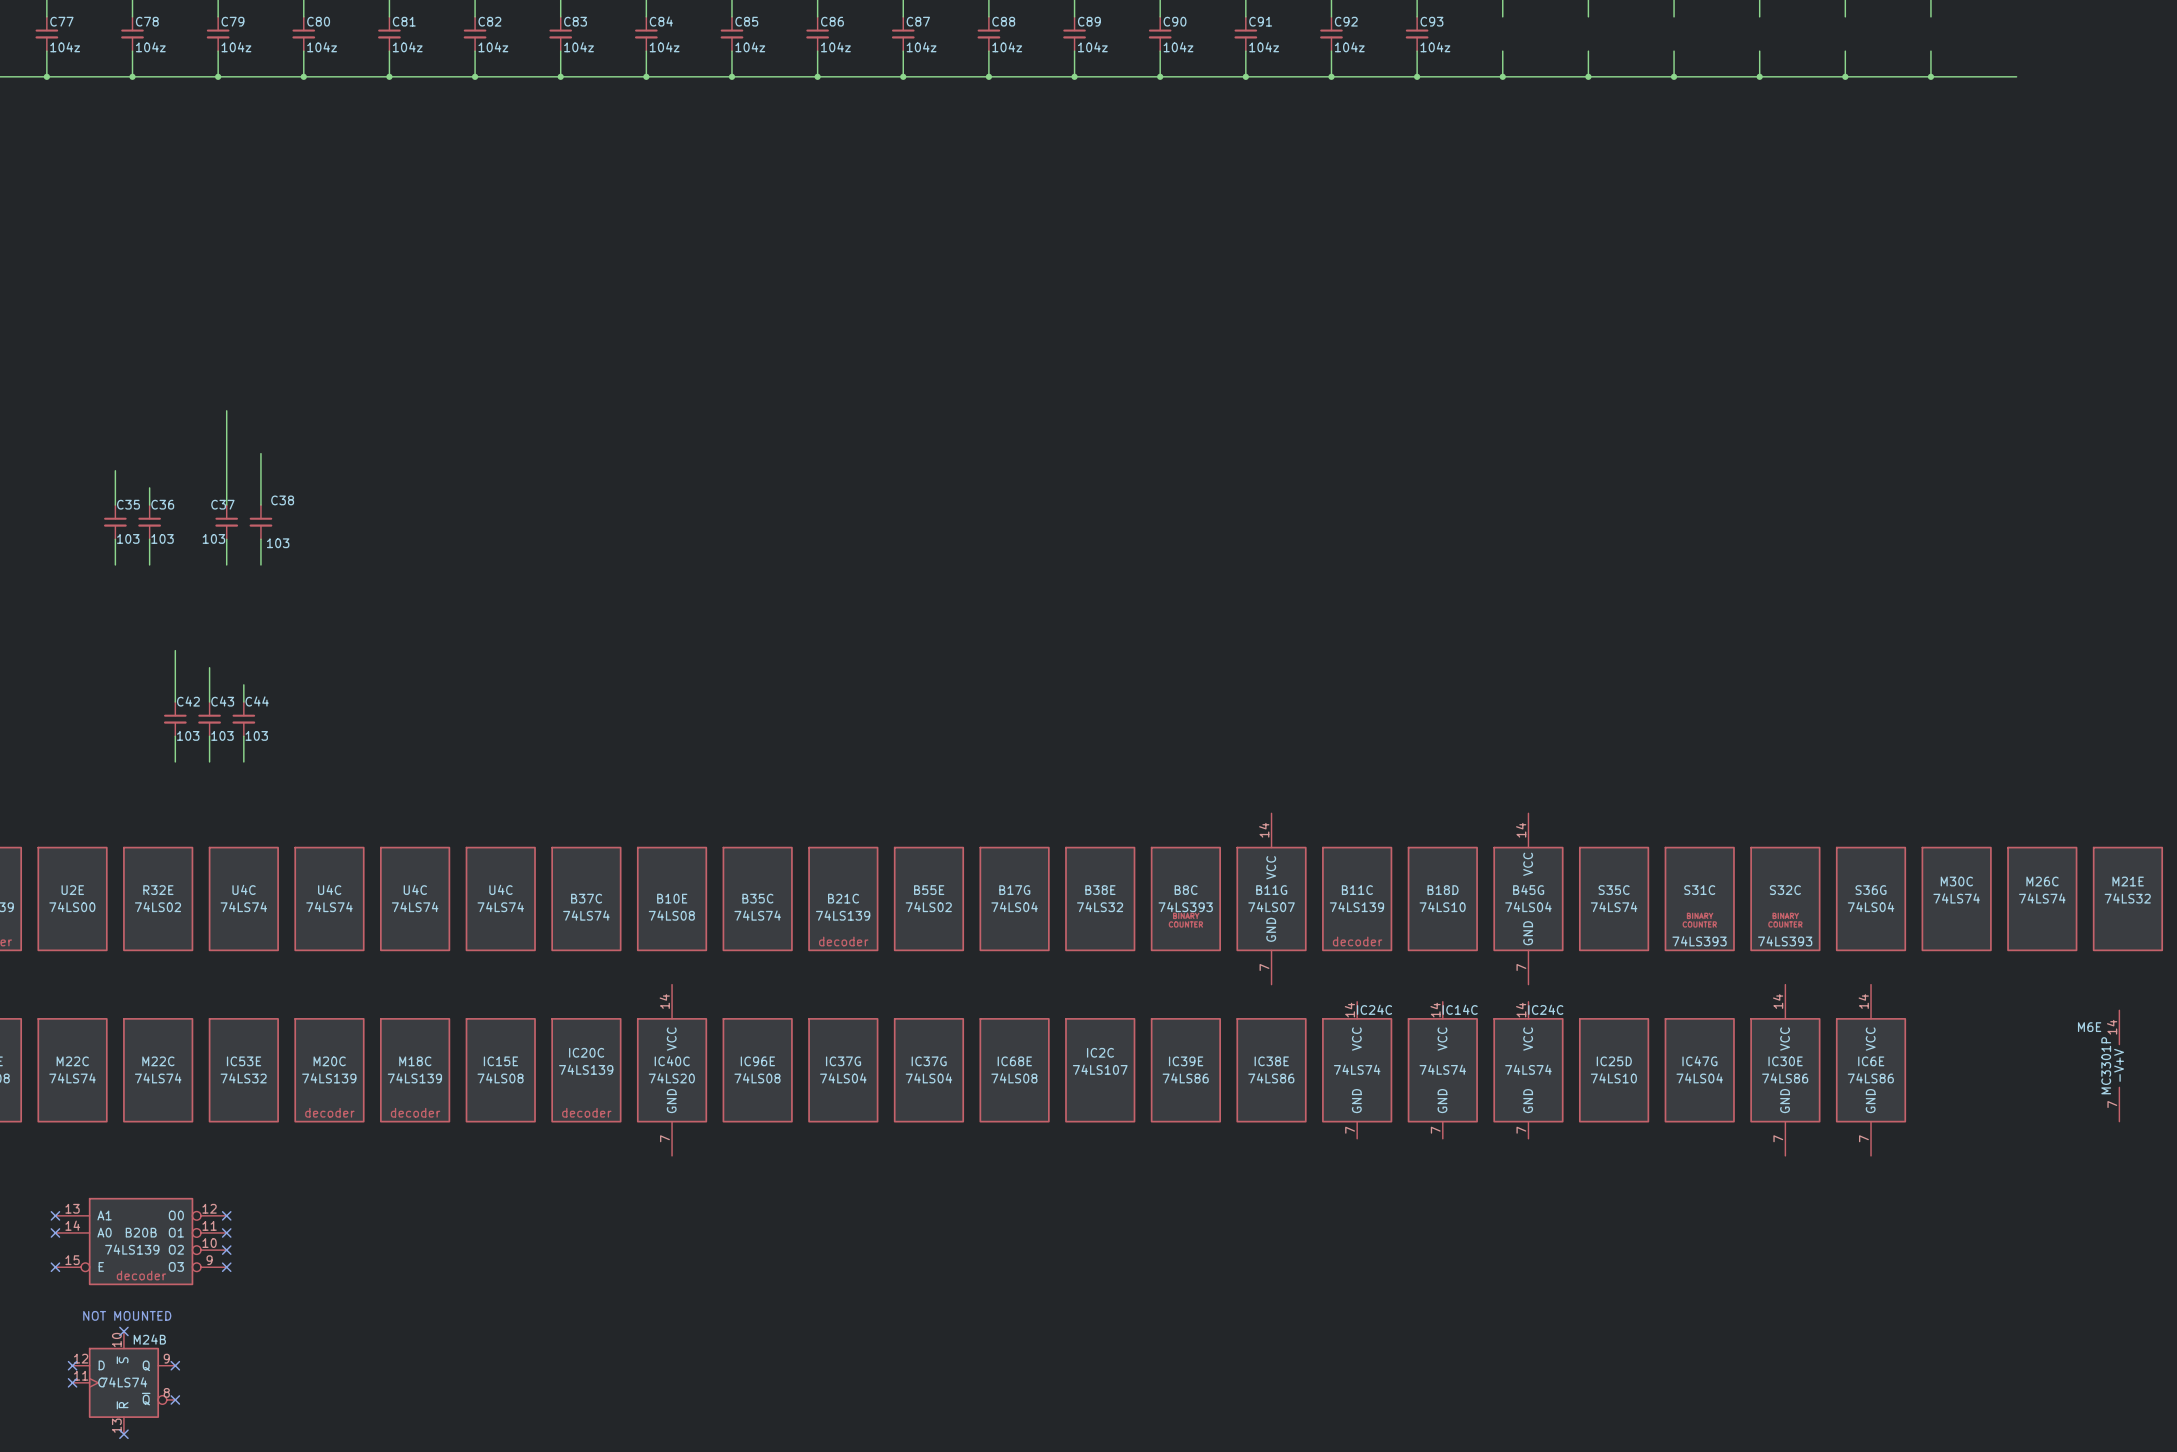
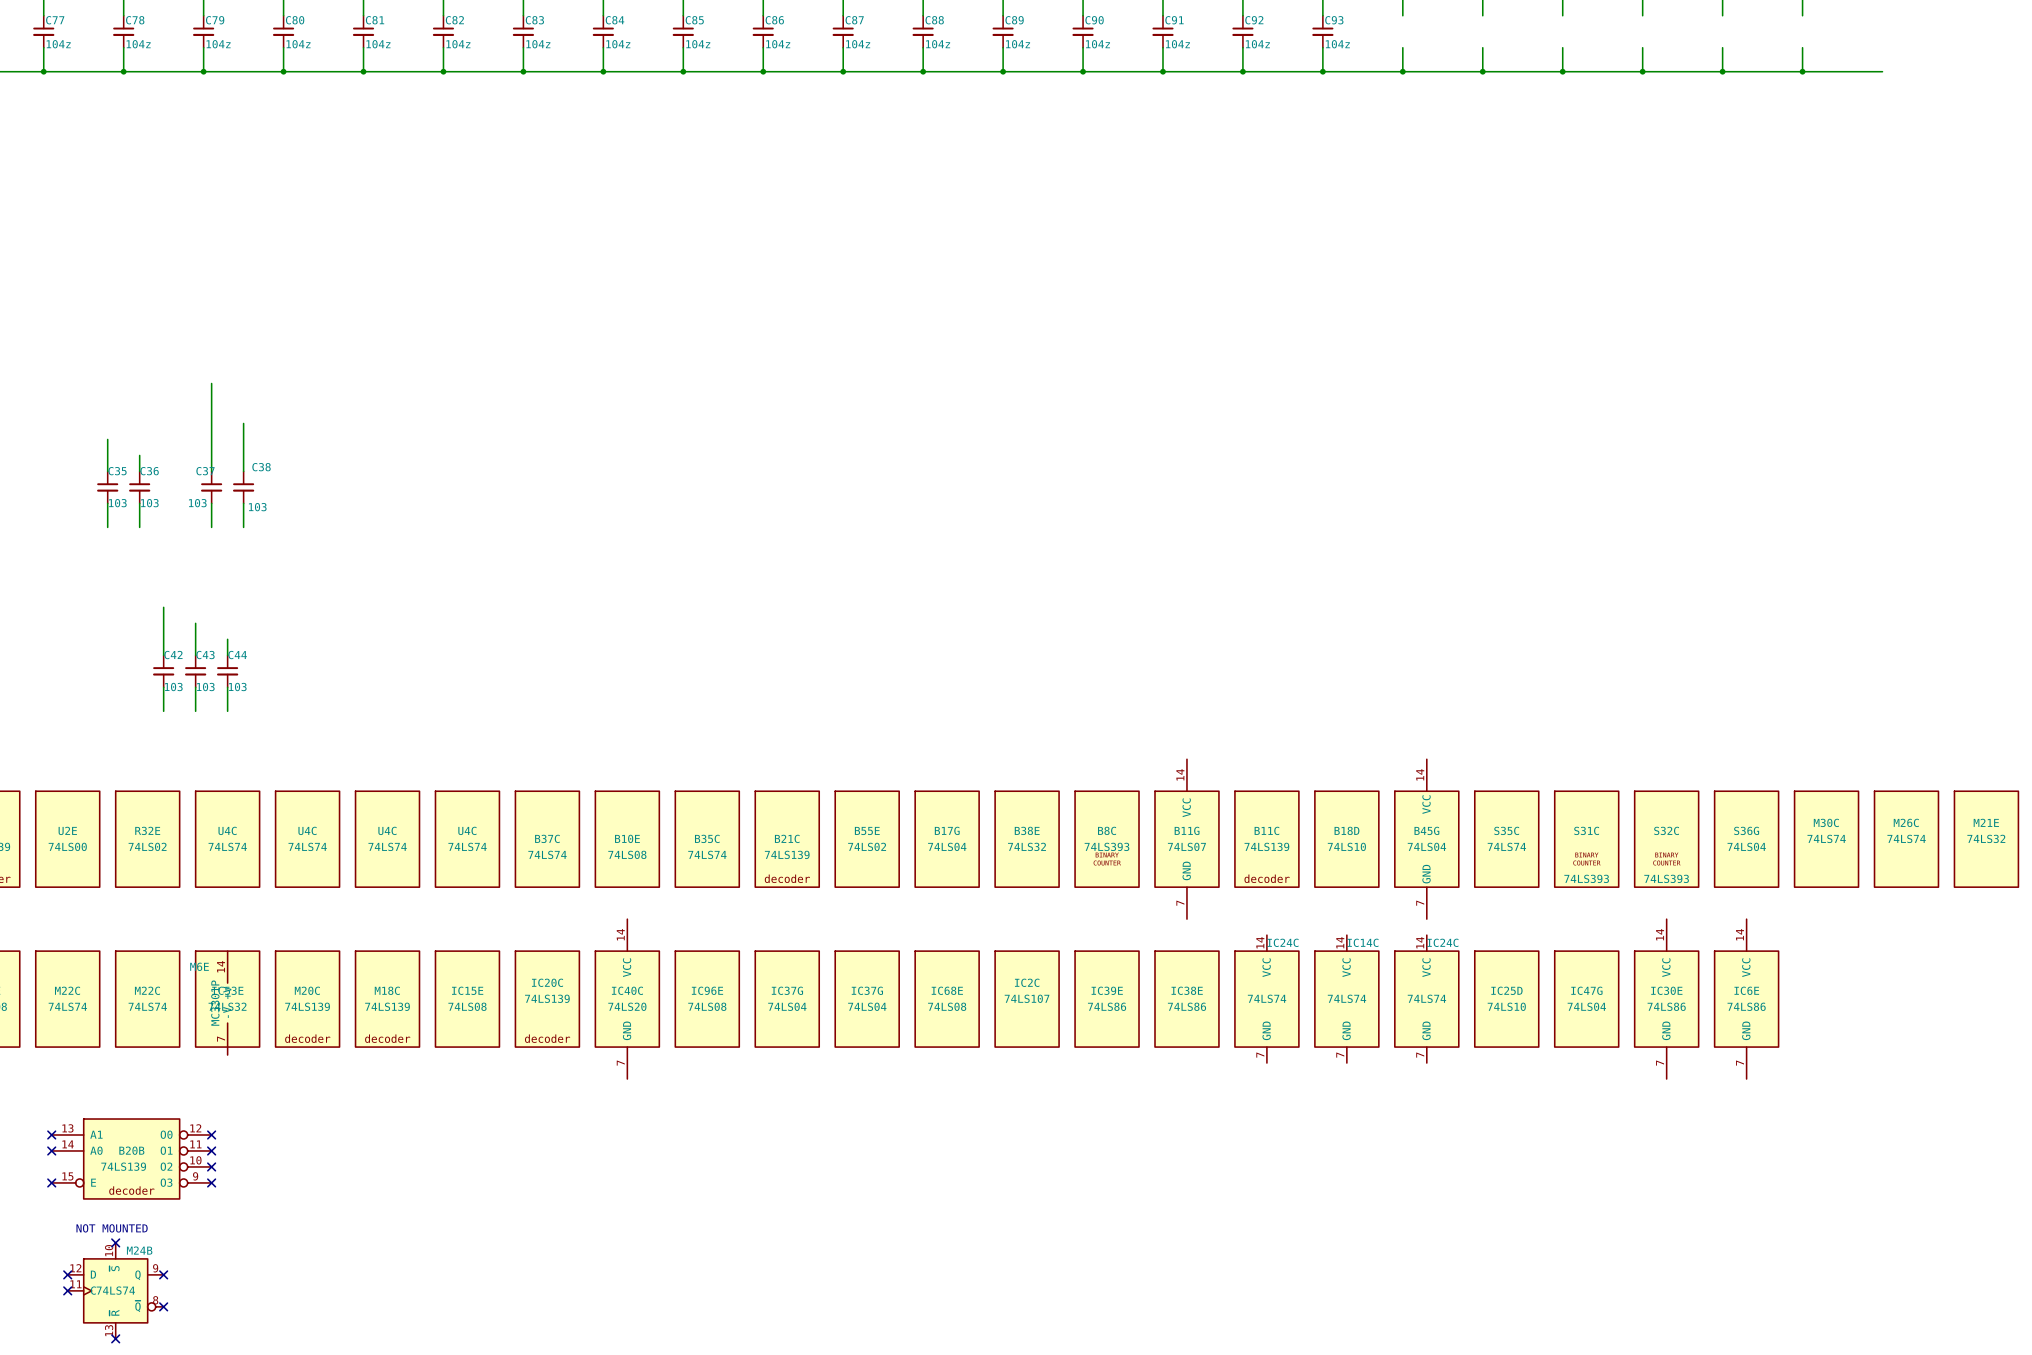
M6E position: (2119, 1065) -> (227, 1003)

